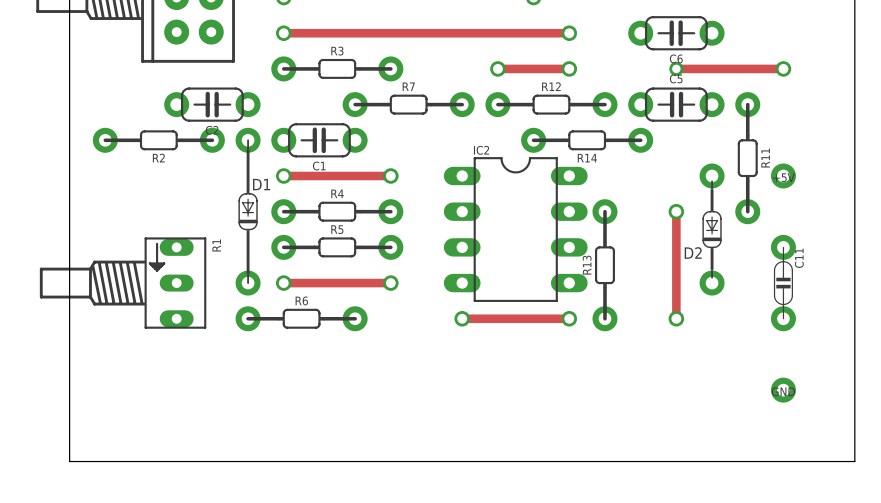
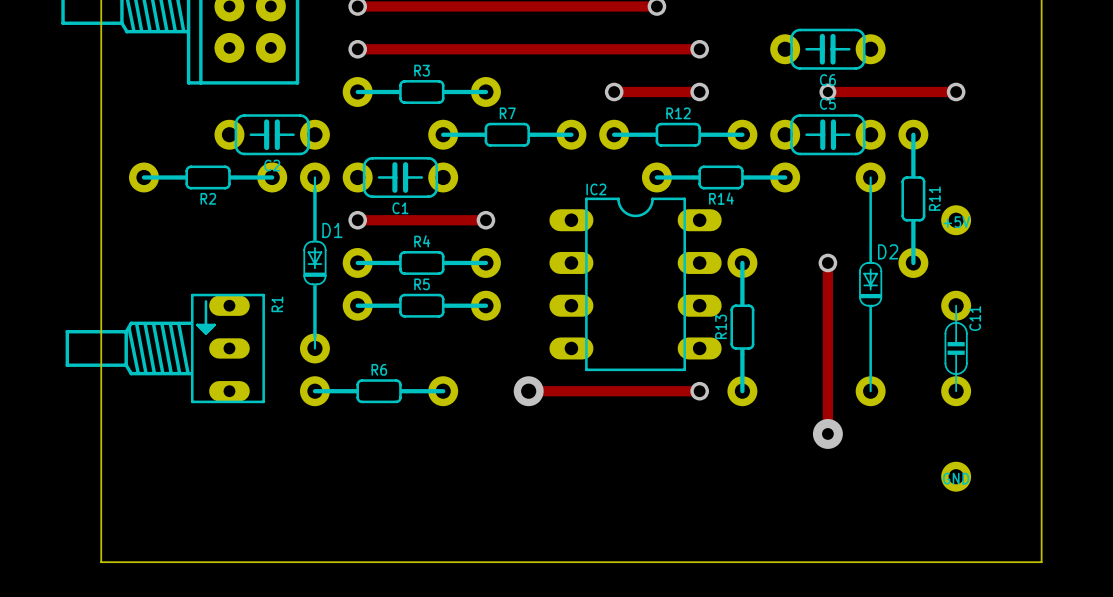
D2 footprint: [699, 163, 725, 296] -> [855, 162, 886, 407]
D2 name position: D2 (693, 252) -> D2 (888, 251)
track: (283, 283) (390, 283) -> none
via: (283, 283) -> none
via: (390, 283) -> none
track: none -> (528, 391) (571, 391)
via: none -> (528, 391)
via: (462, 318) -> none
track: none -> (827, 391) (827, 433)
via: (676, 318) -> none
via: none -> (827, 433)

